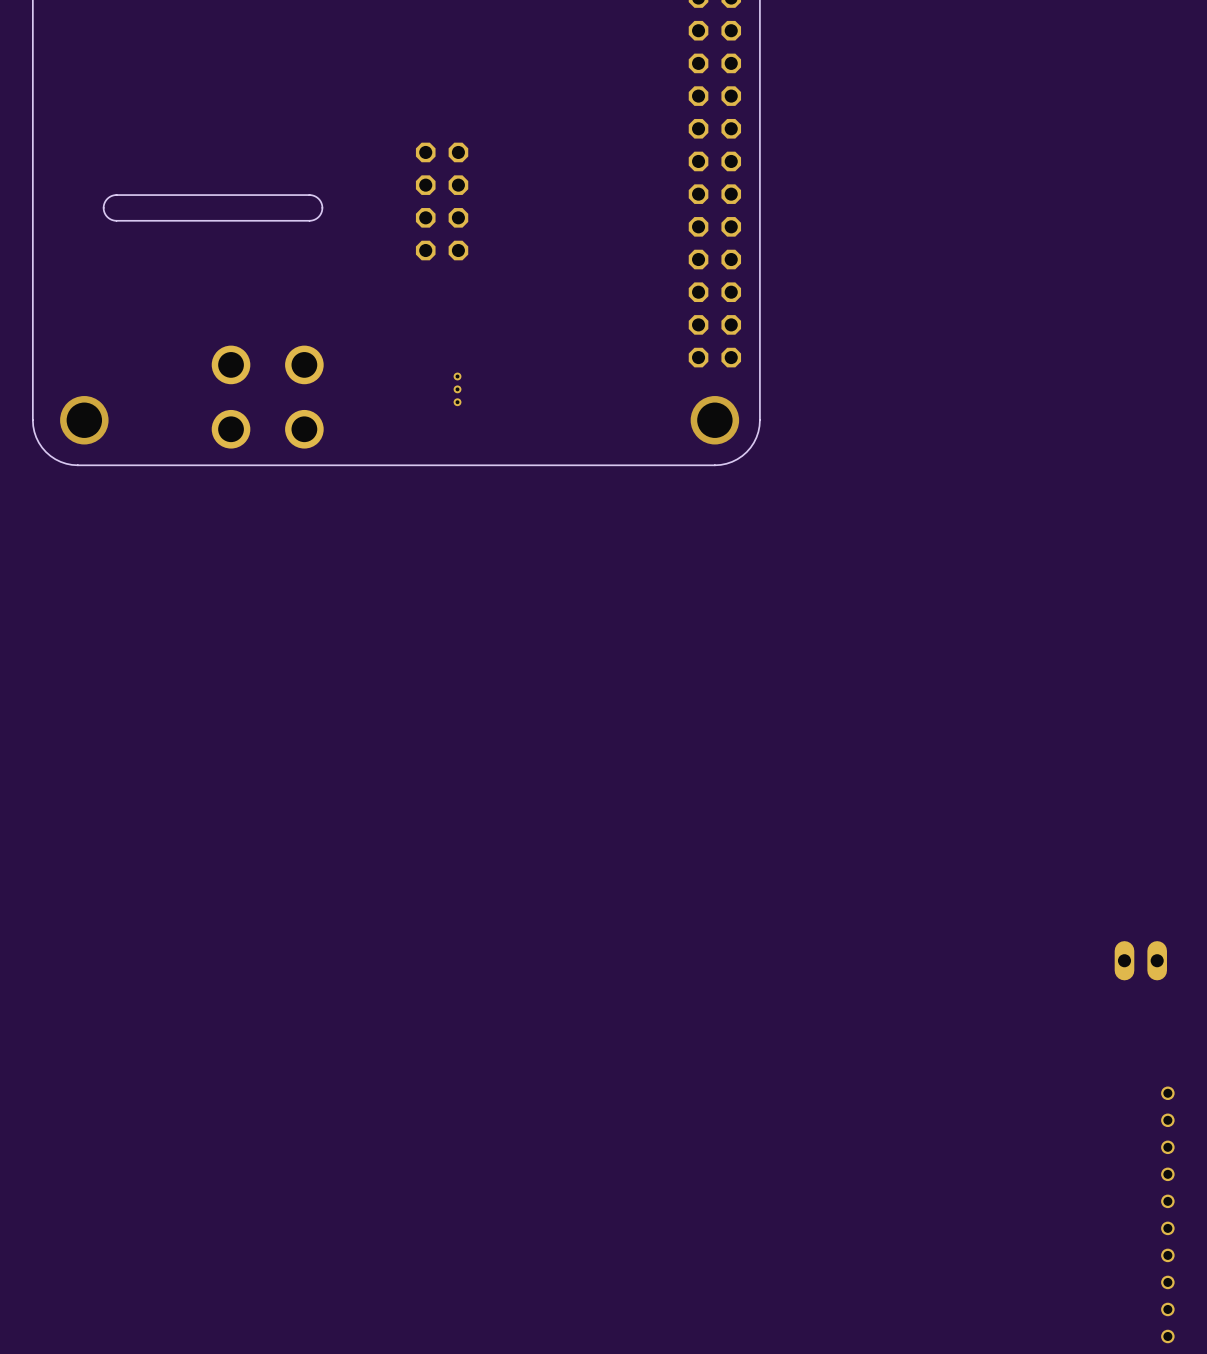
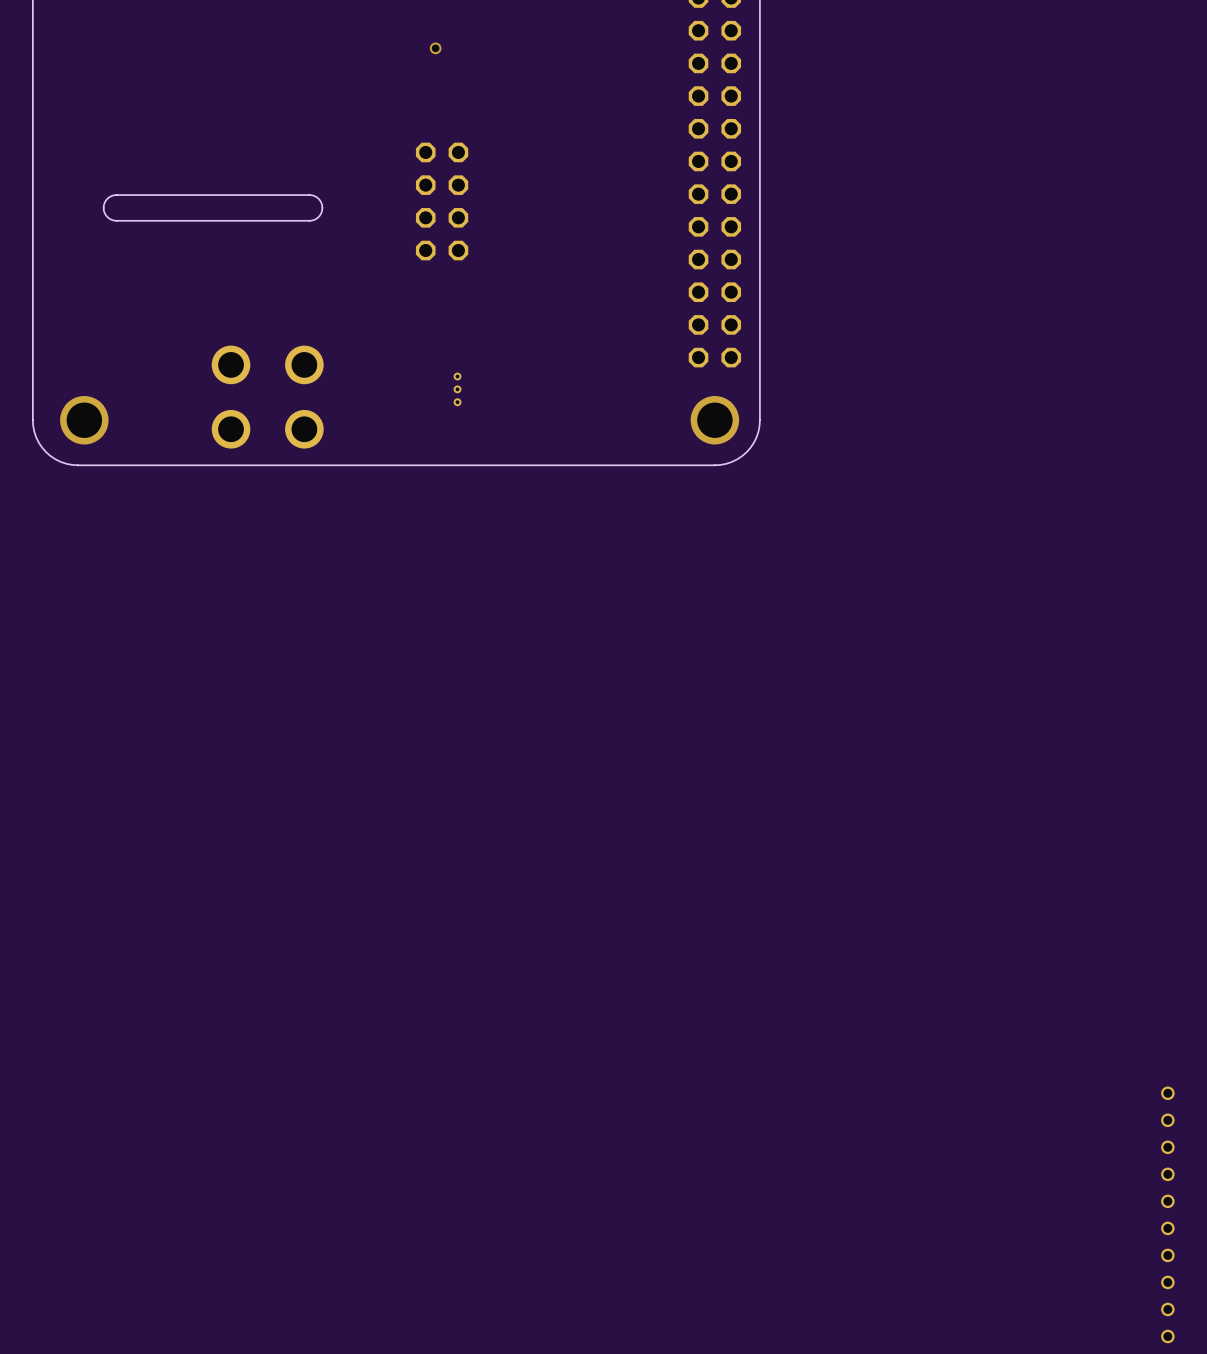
via: none -> (435, 48)
part: (1140, 960) -> none

